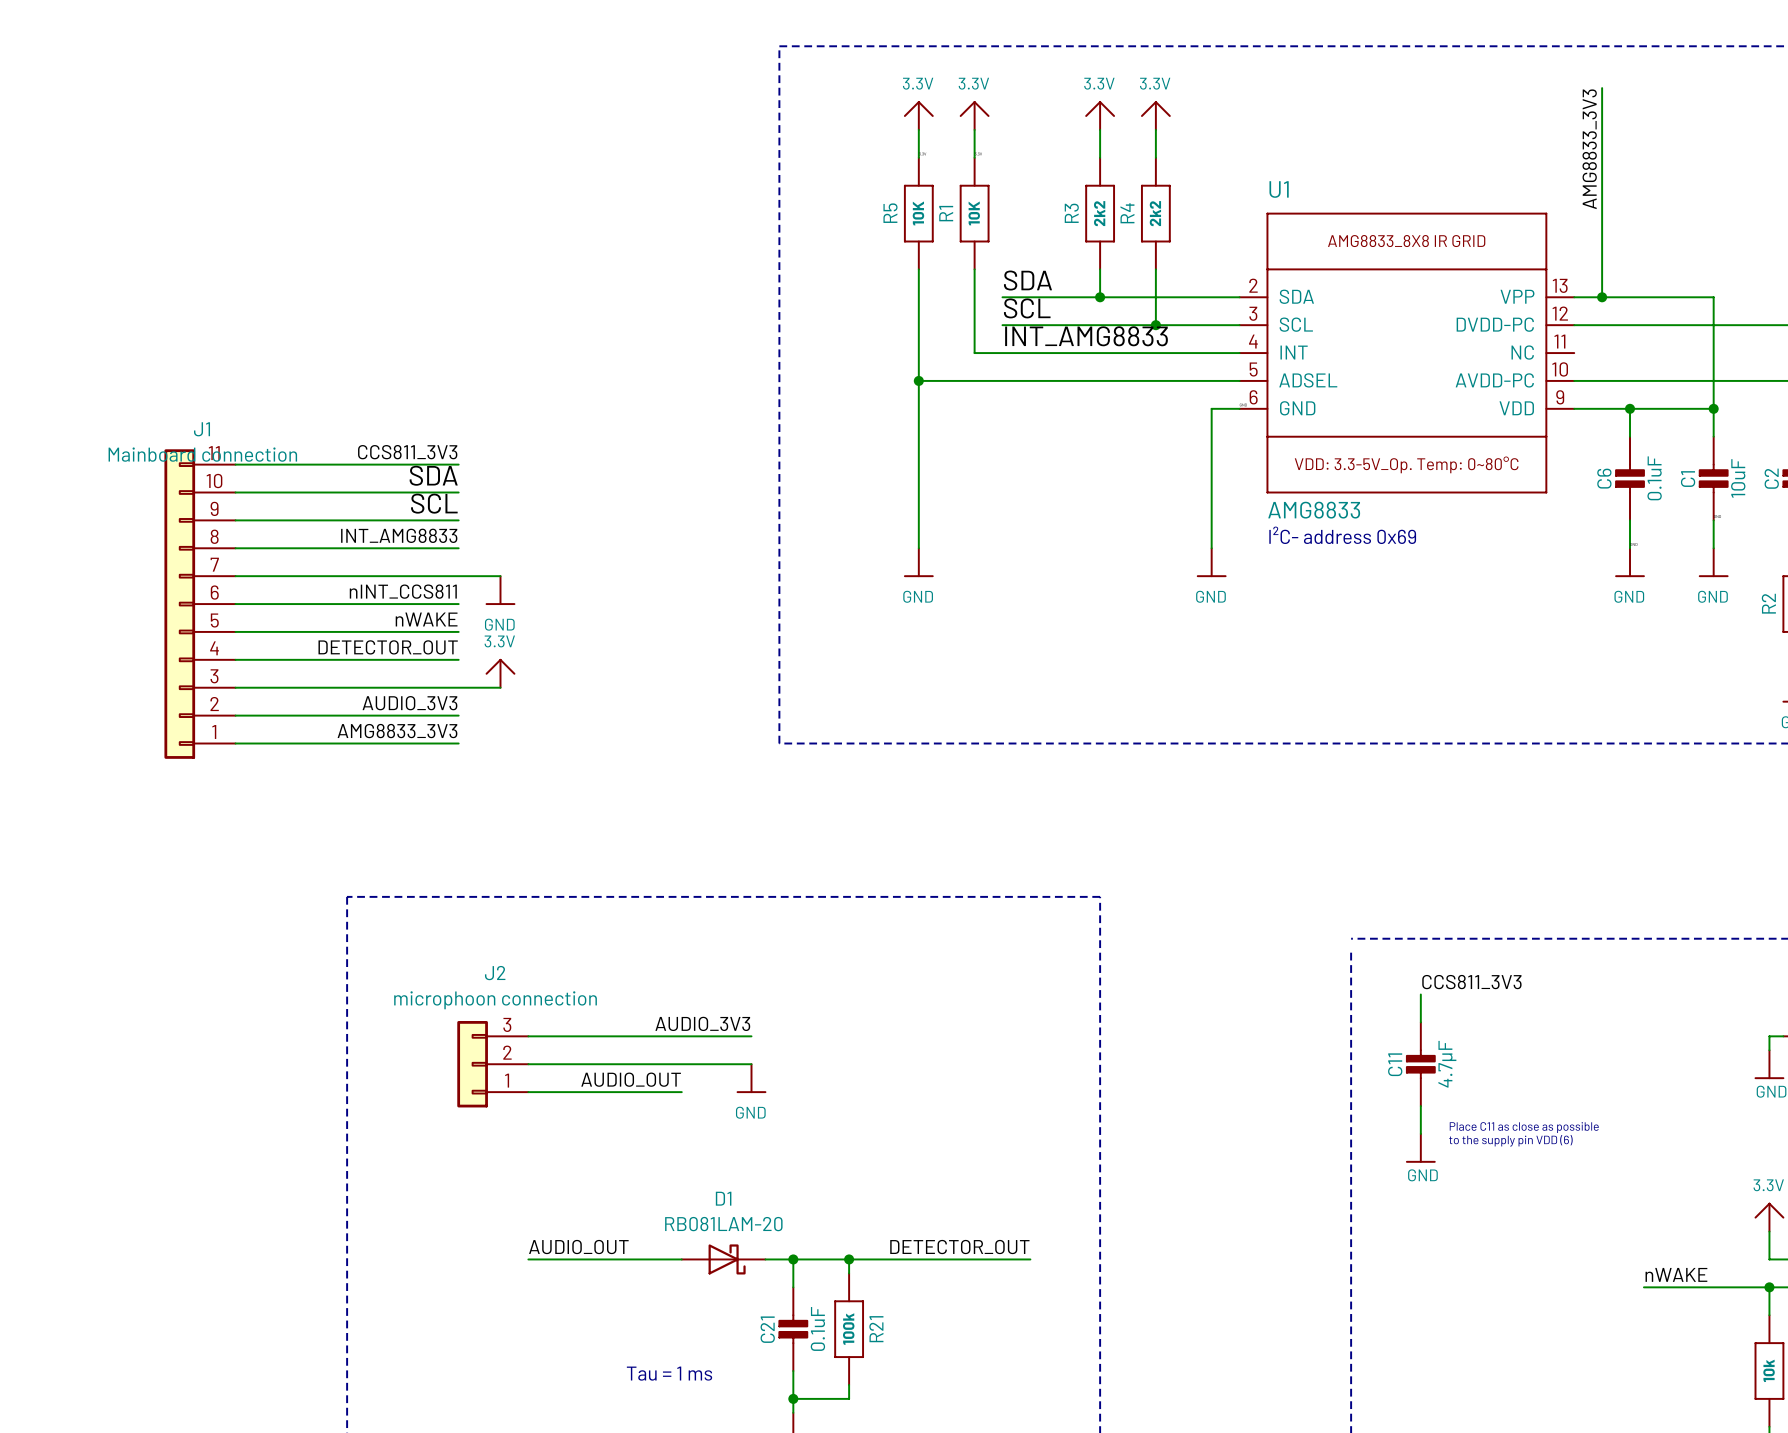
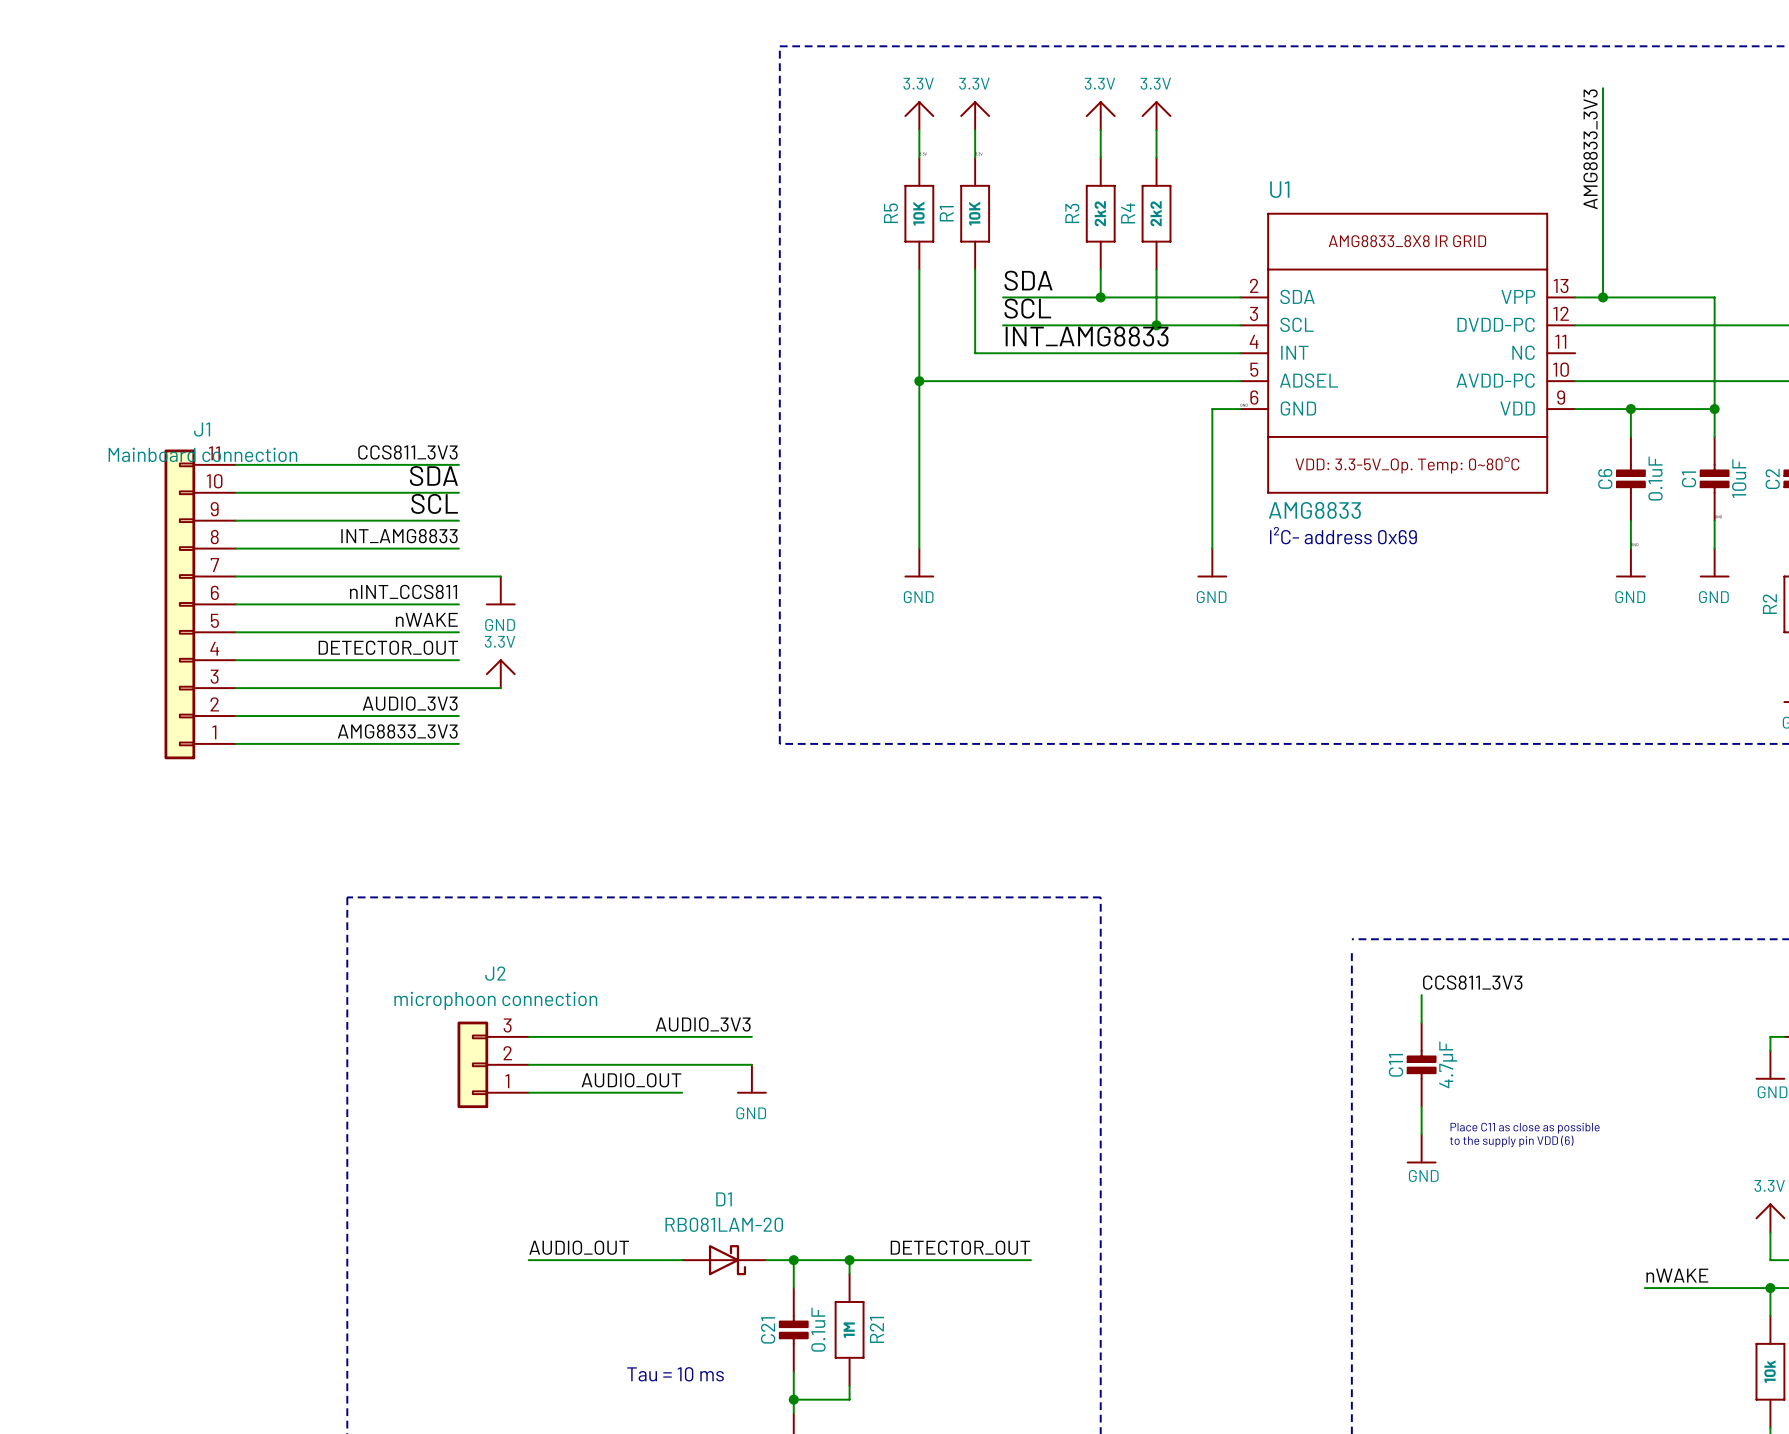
R21 value: 100k (848, 1329) -> 1M (849, 1330)
text: Tau = 1 ms (669, 1373) -> Tau = 10 ms (675, 1374)

